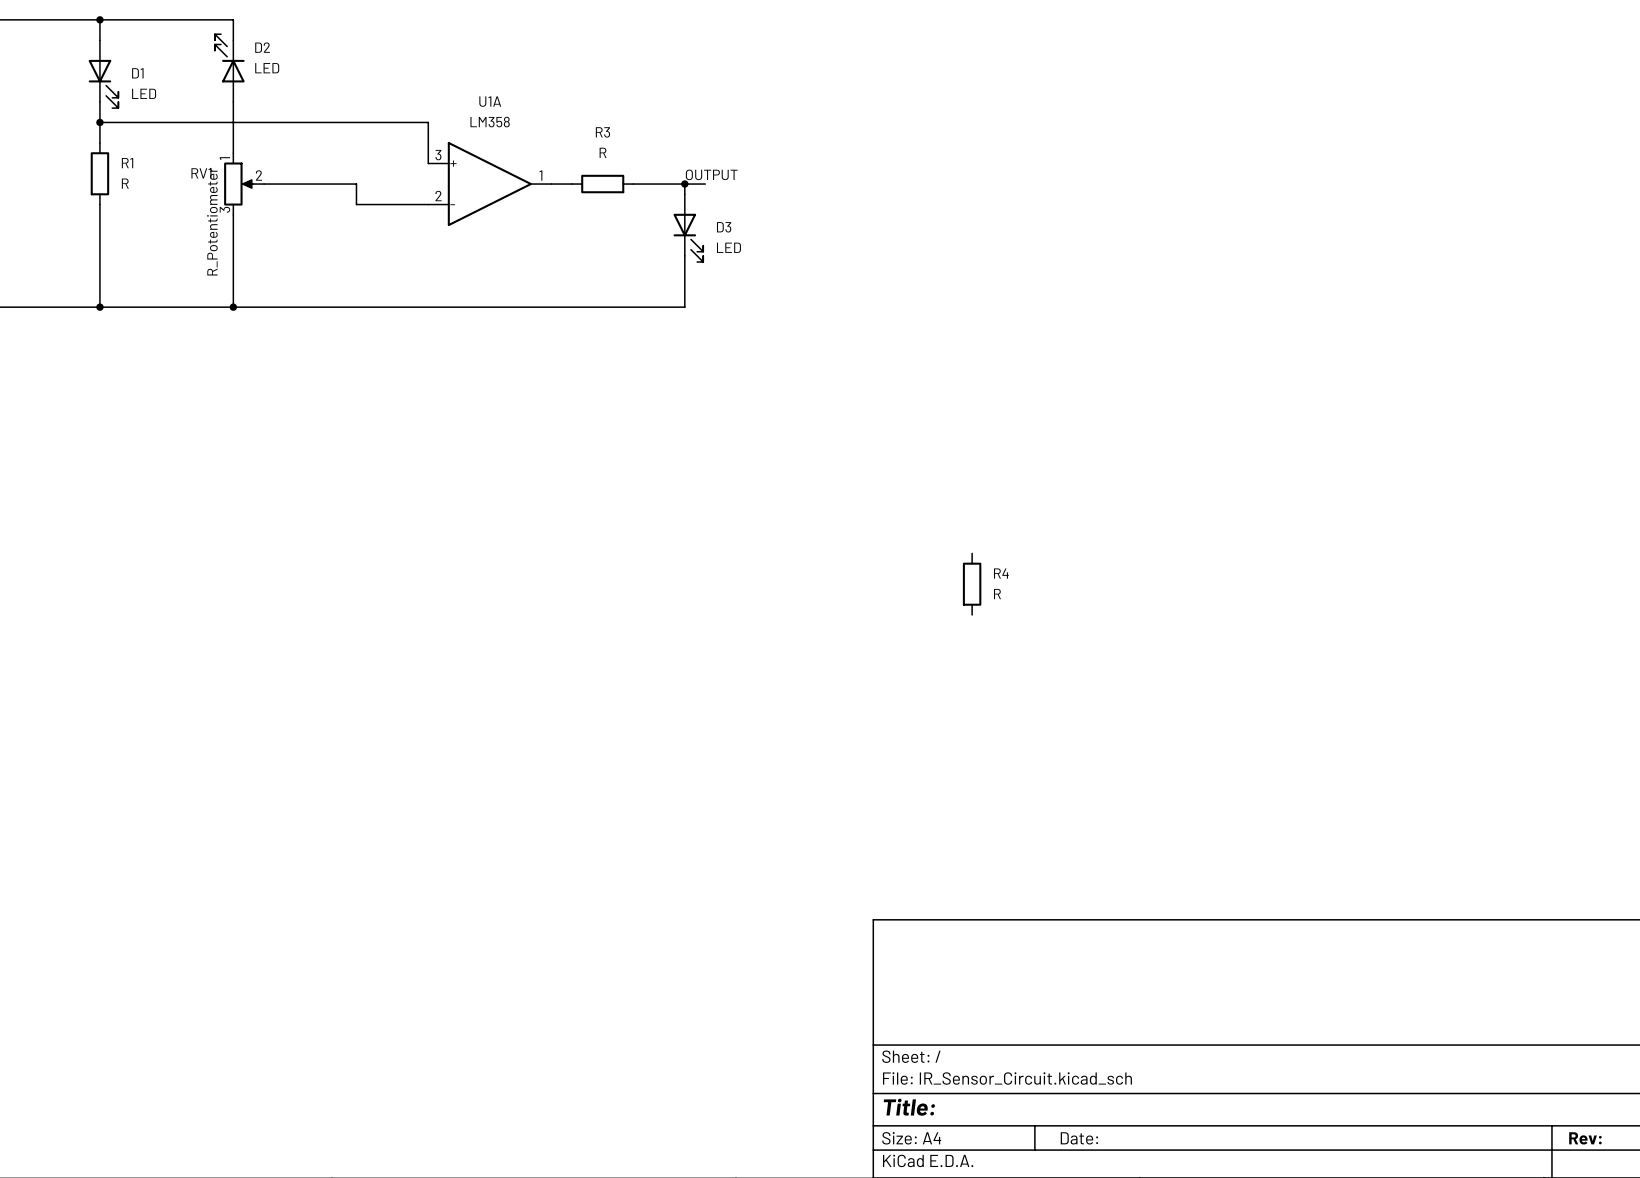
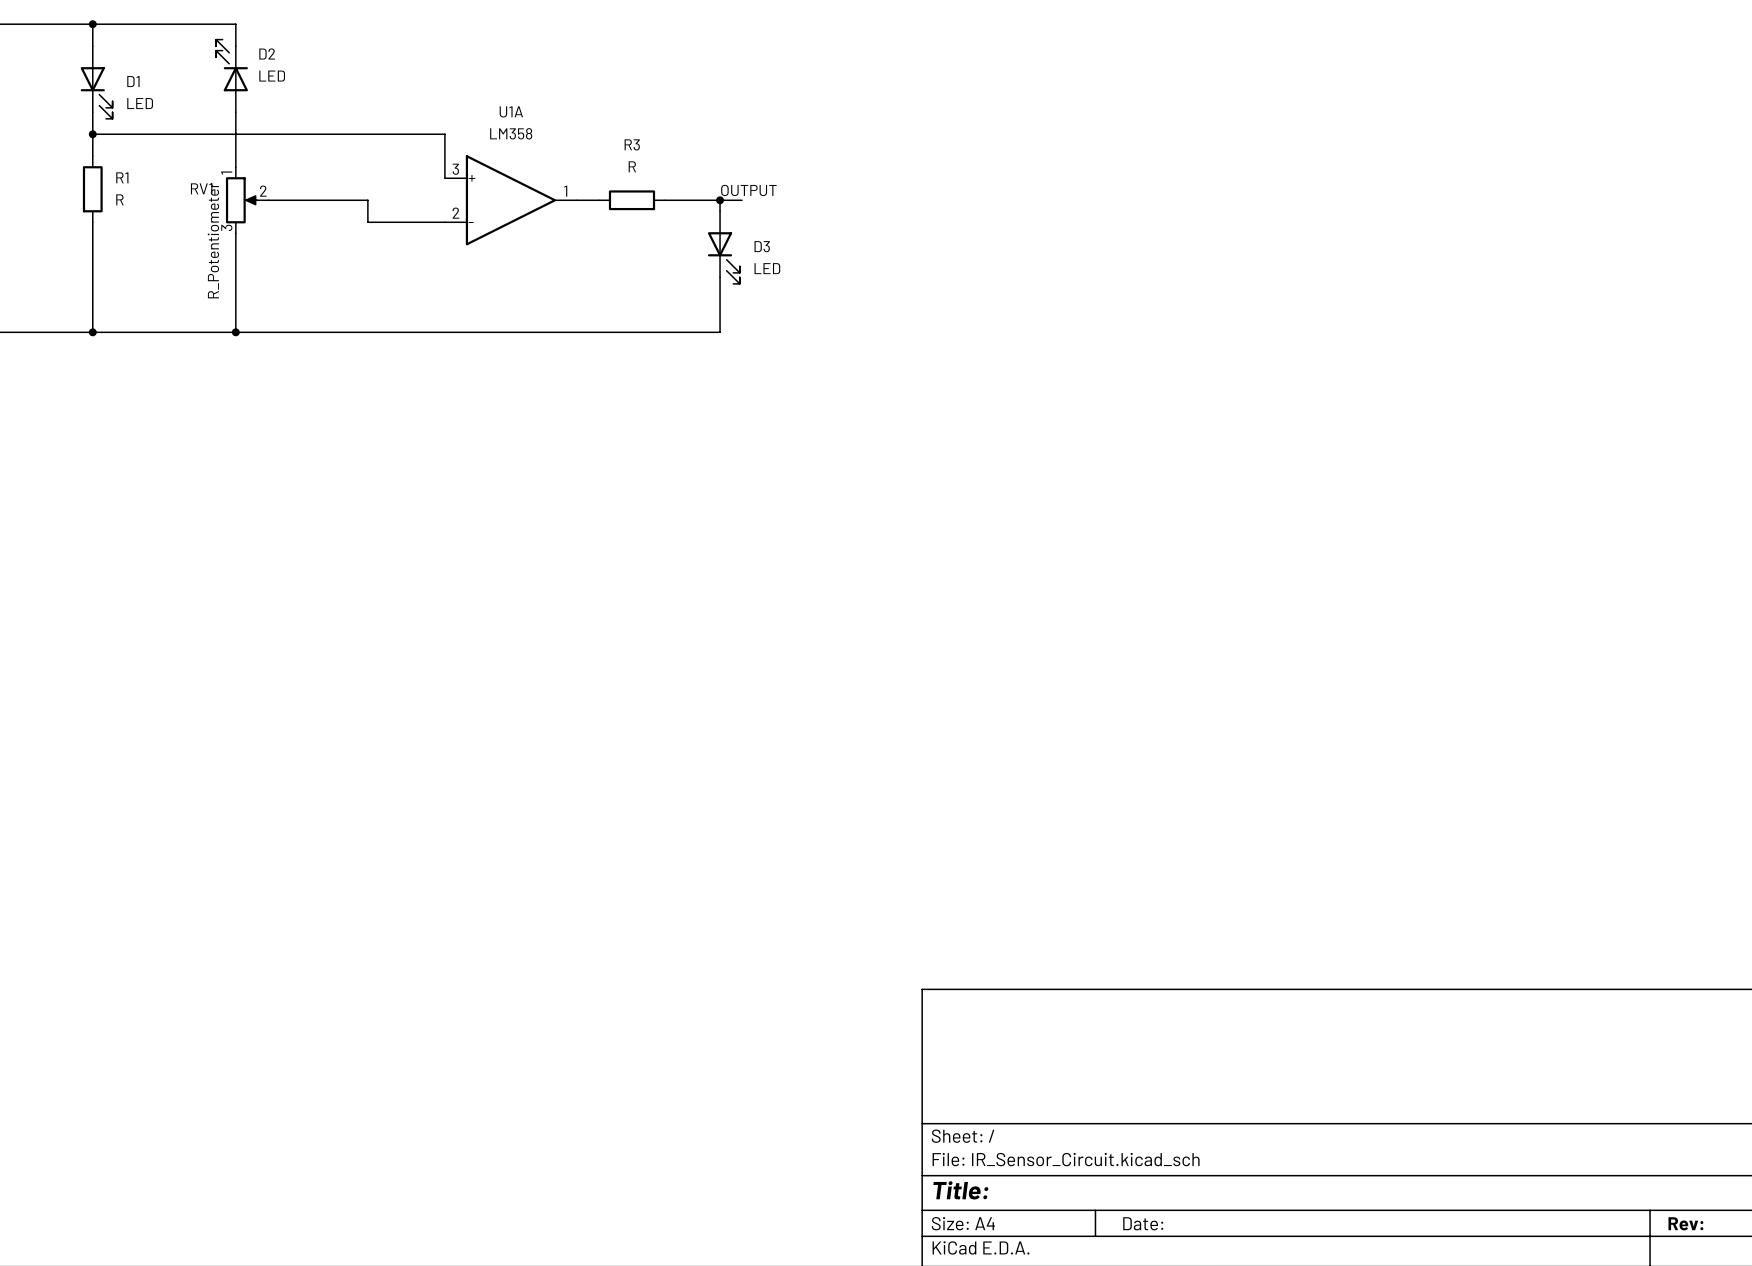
R4: R (972, 584) -> none

